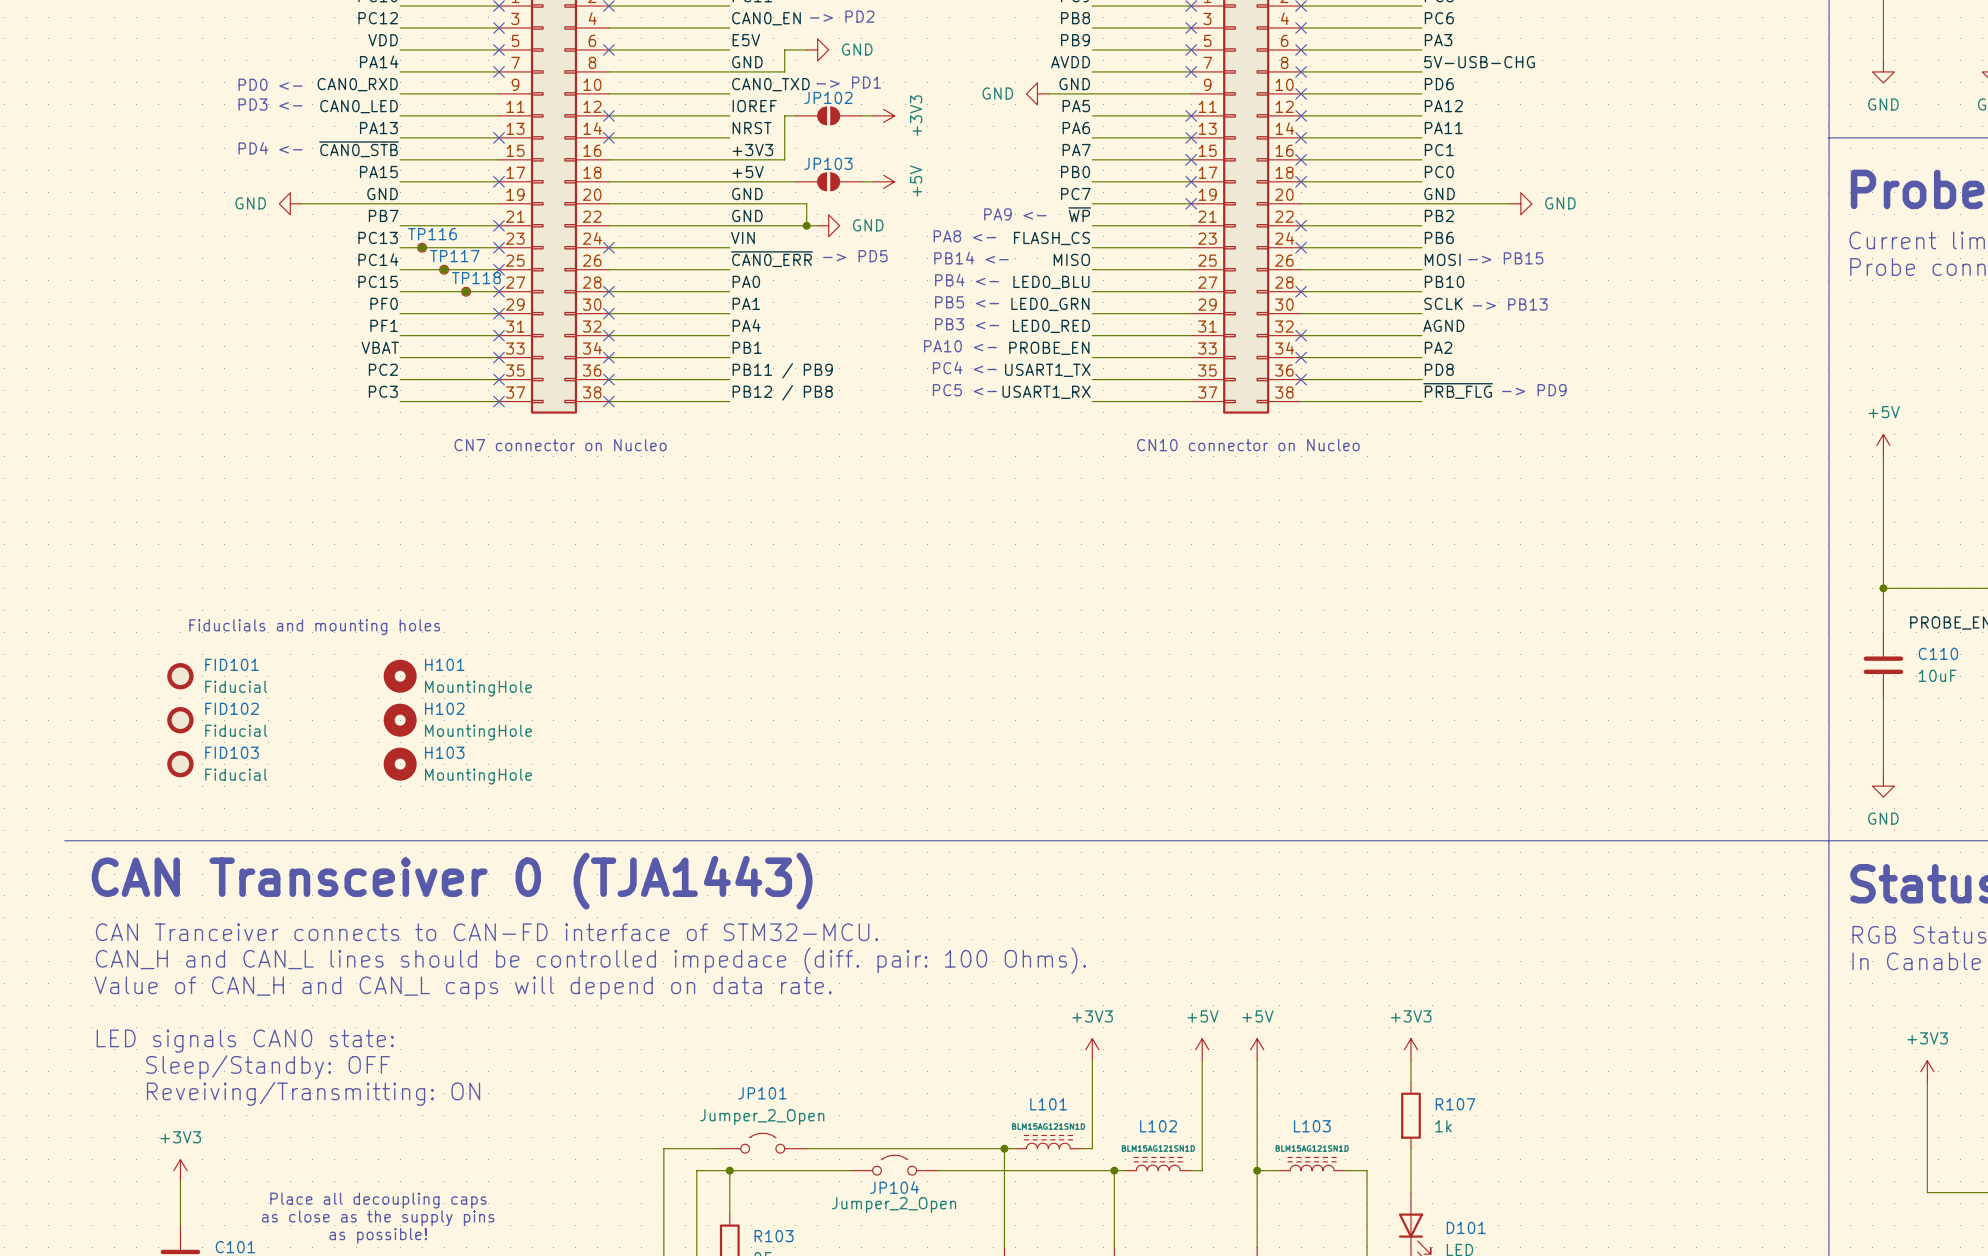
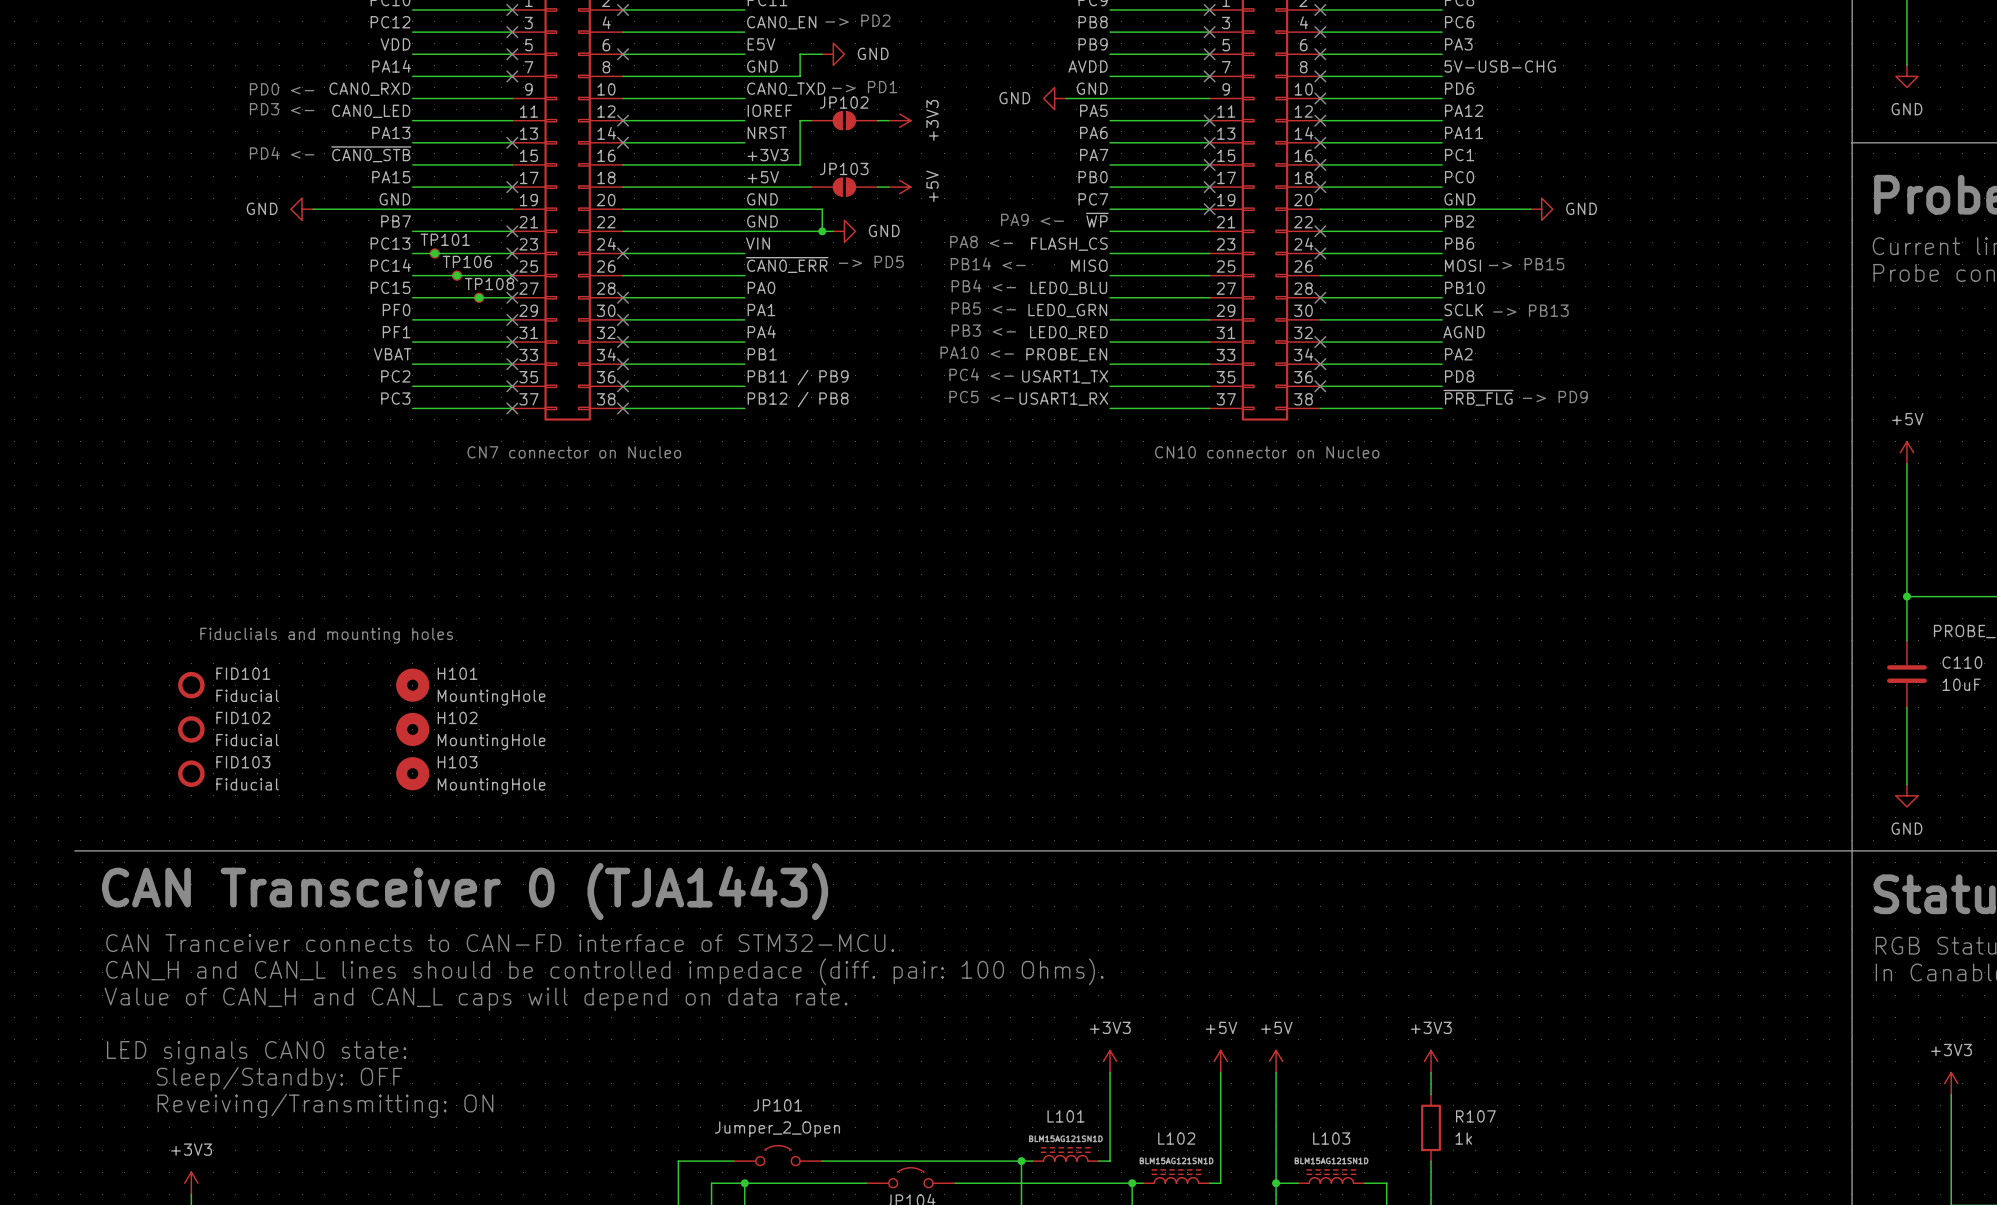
TP116 name: TP116 (432, 234) -> TP101 (445, 239)
TP117 name: TP117 (454, 256) -> TP106 (467, 261)
TP118 name: TP118 (476, 278) -> TP108 (489, 284)

